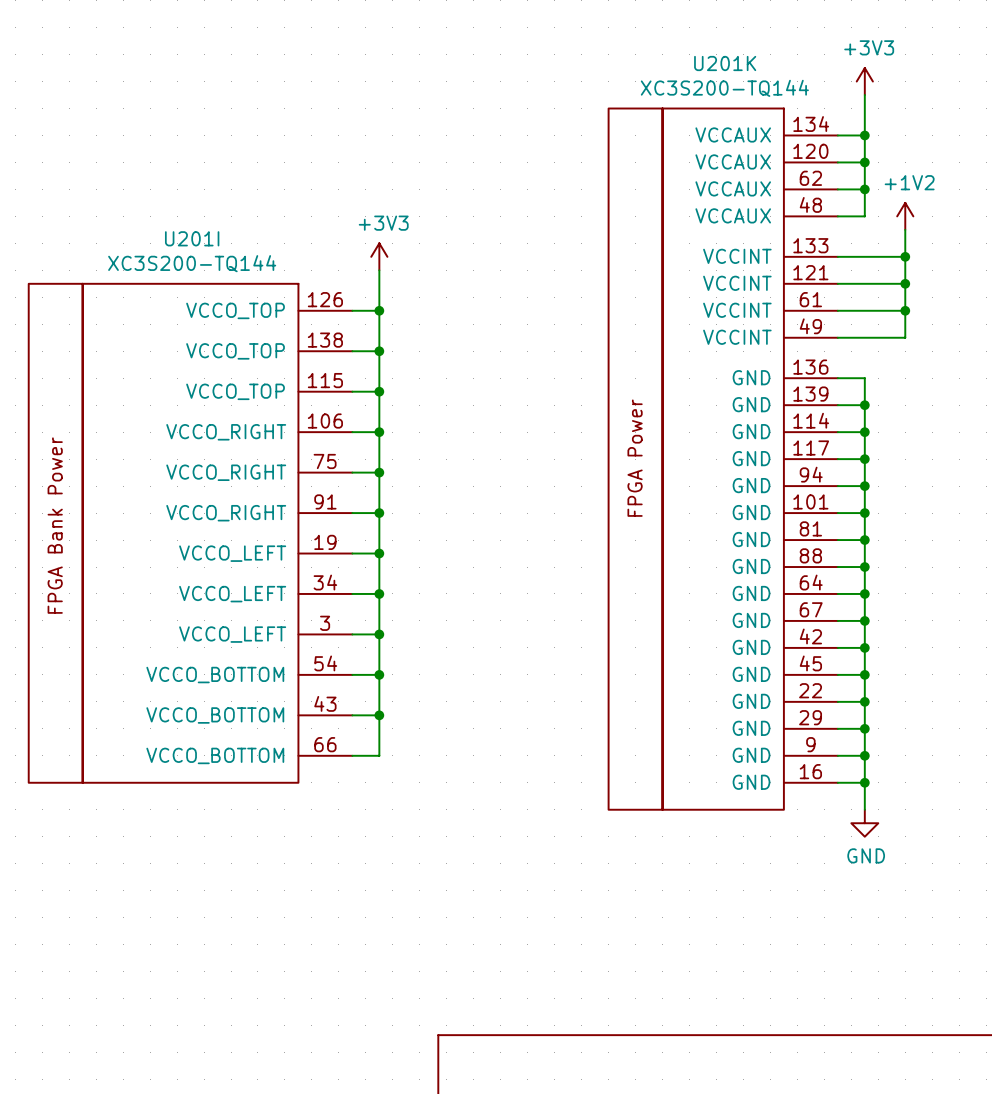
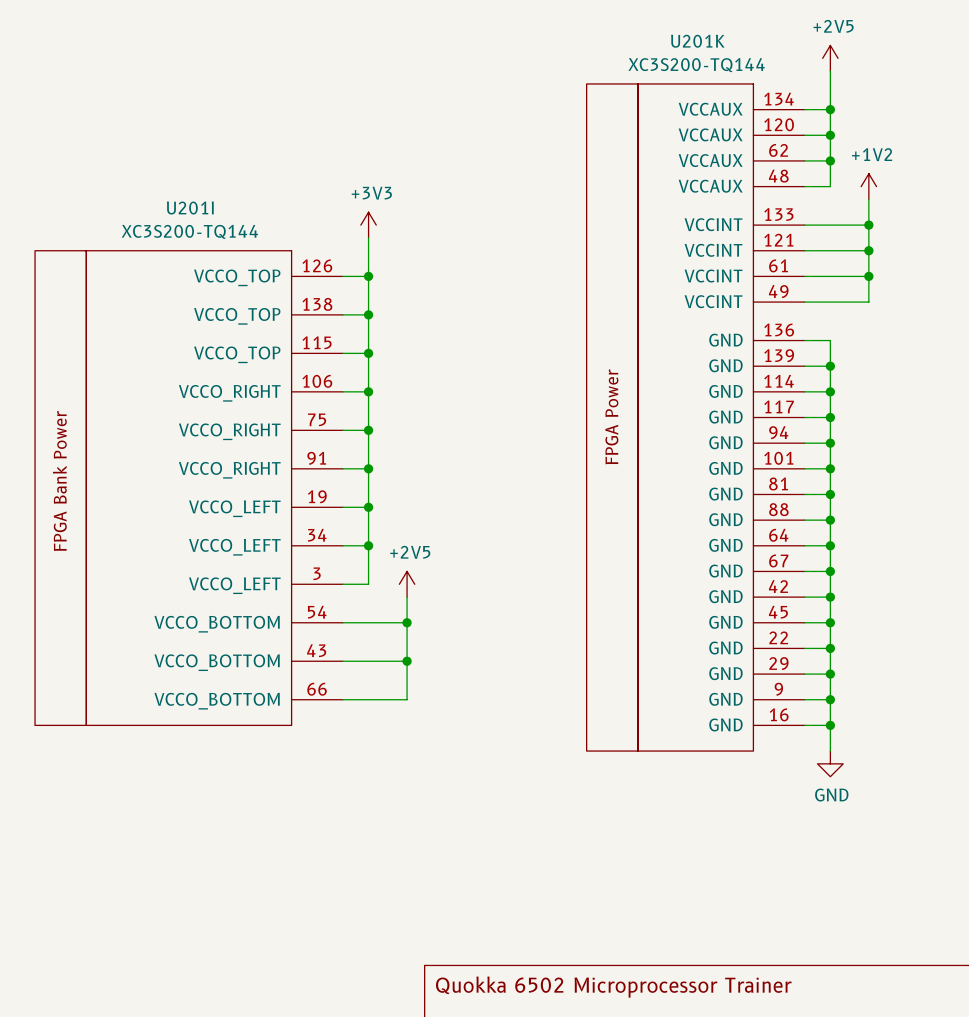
power symbol: +3V3 (864, 81) -> +2V5 (830, 58)
wire: (379, 634) (379, 755) -> (407, 597) (407, 699) (368, 699)
junction: (379, 634) -> none
power symbol: none -> +2V5 (407, 584)
wire: none -> (368, 622) (407, 622)
junction: (379, 674) -> none
junction: none -> (407, 622)
wire: none -> (368, 661) (407, 661)
junction: (379, 715) -> none
junction: none -> (407, 661)
title block: none -> Quokka 6502 Microprocessor Trainer (613, 987)

